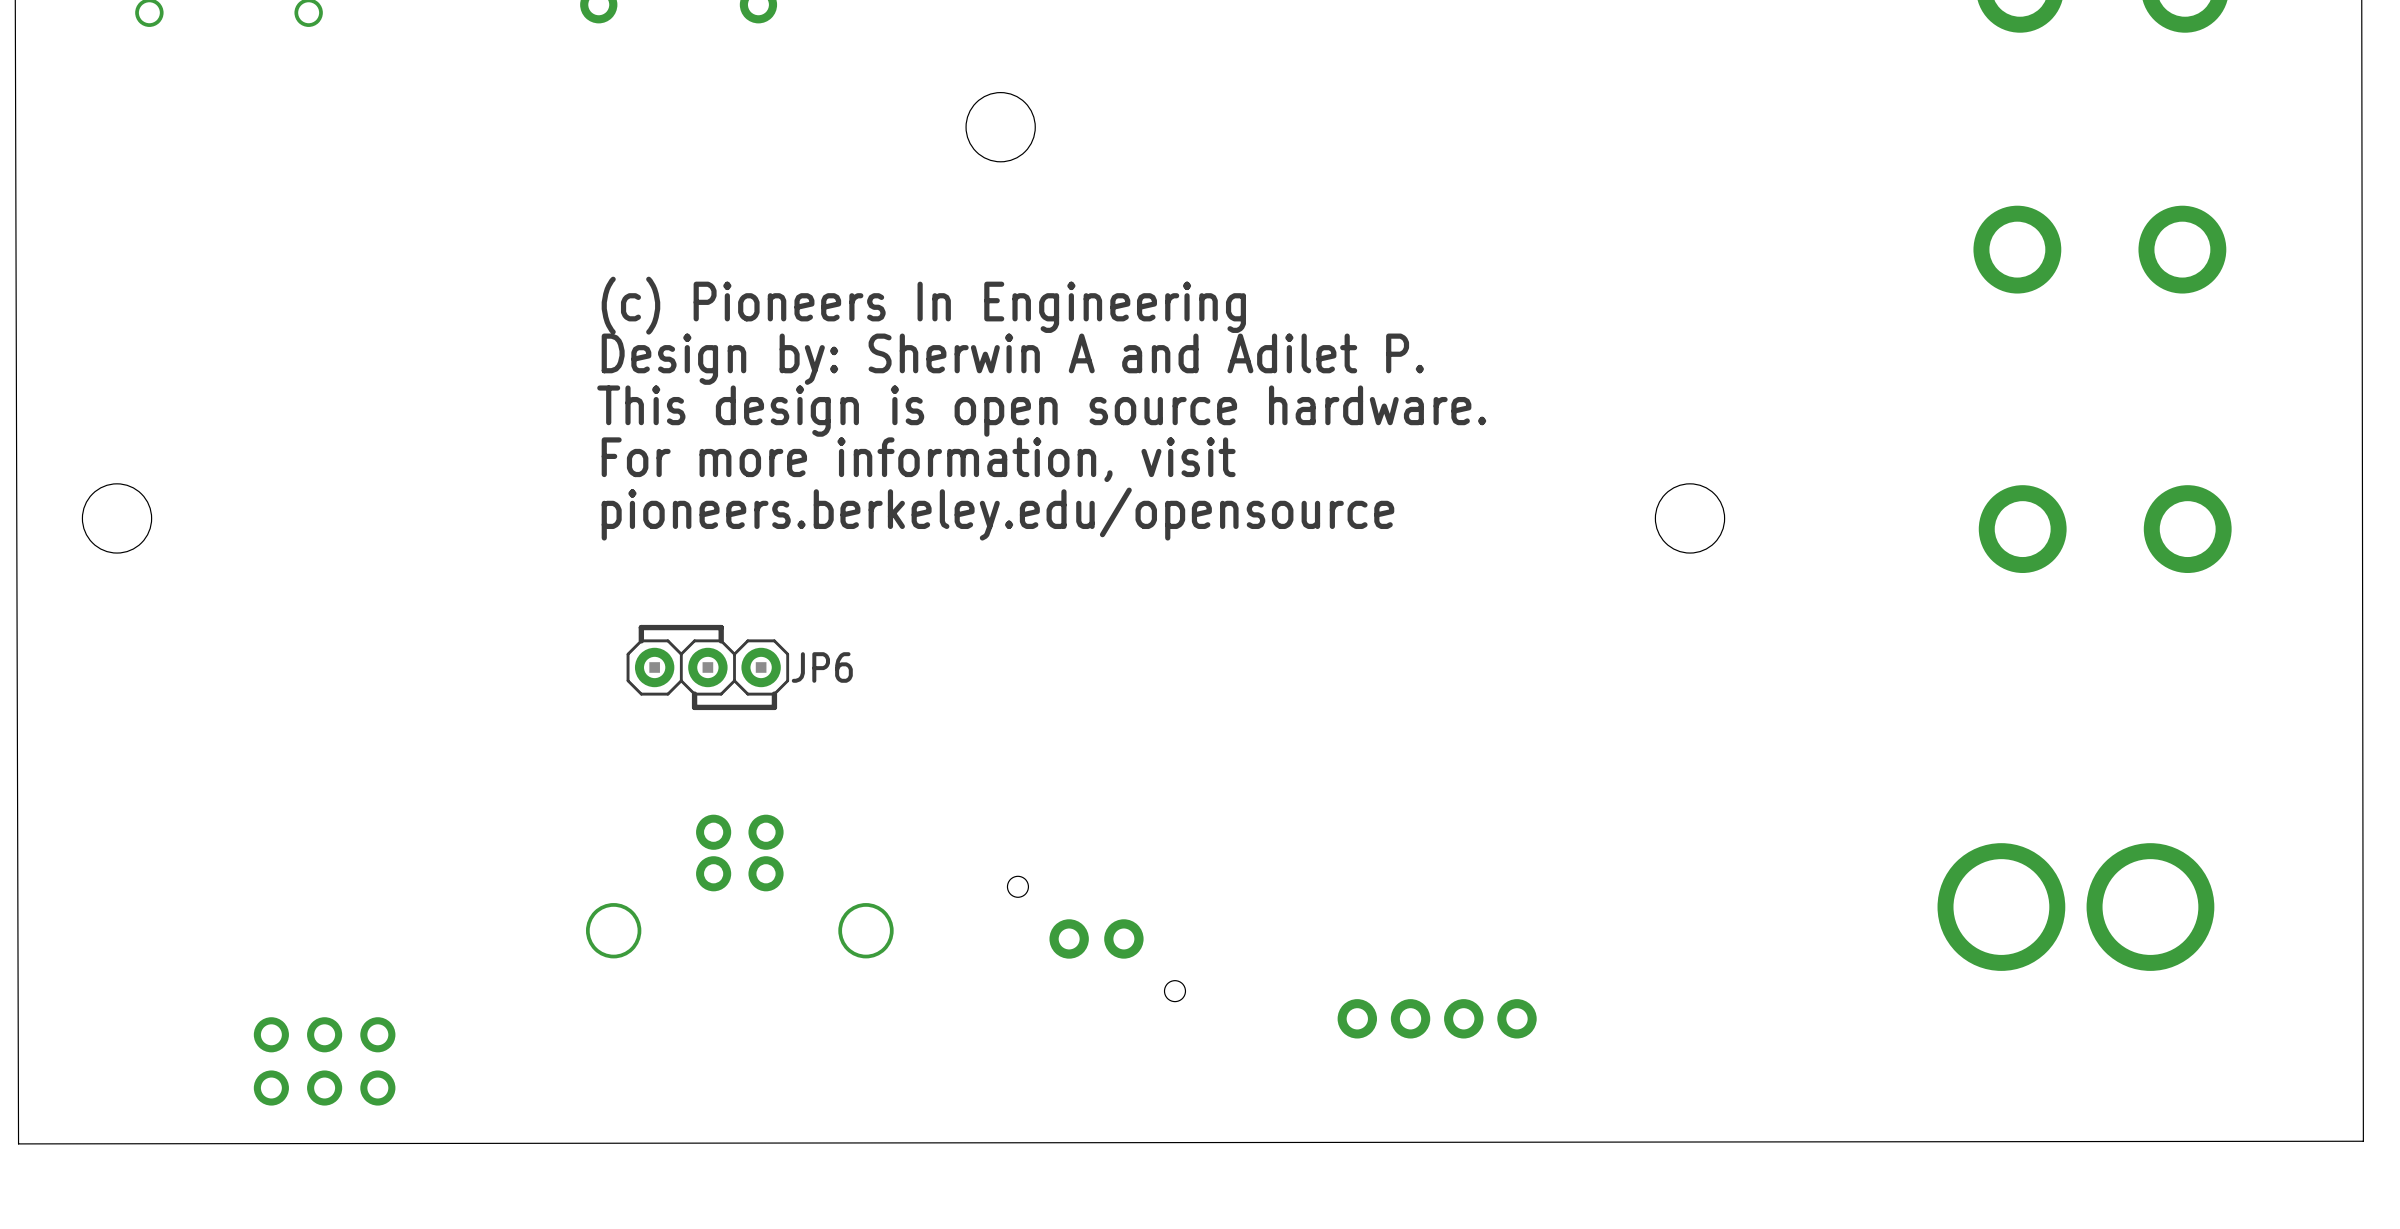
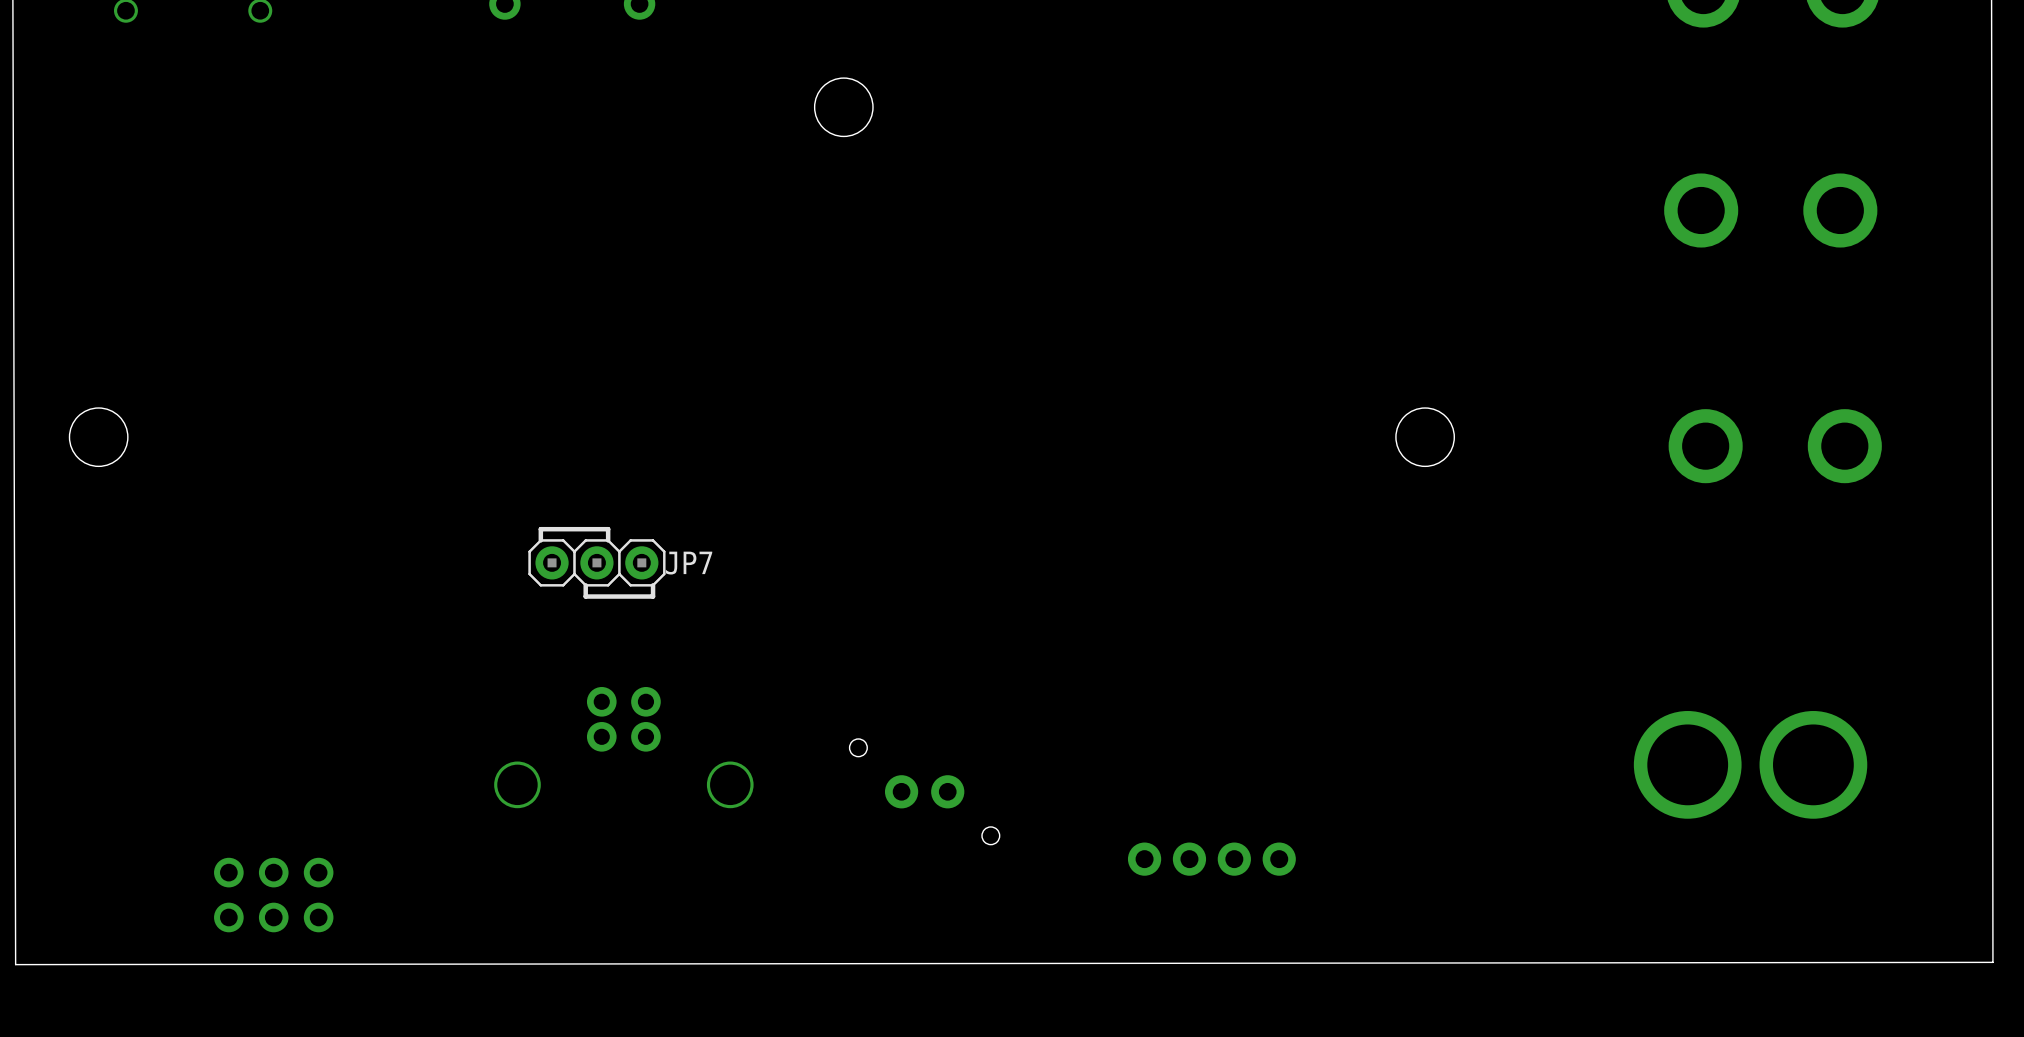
text: (c) Pioneers In Engineering (923, 305) -> none
text: Design by: Sherwin A and Adilet P. (1012, 359) -> none
text: This design is open source hardware. (1041, 411) -> none
text: For more information, visit (918, 459) -> none
text: pioneers.berkeley.edu/opensource (997, 514) -> none
JP6 name: JP6 (822, 667) -> JP7 (688, 563)

